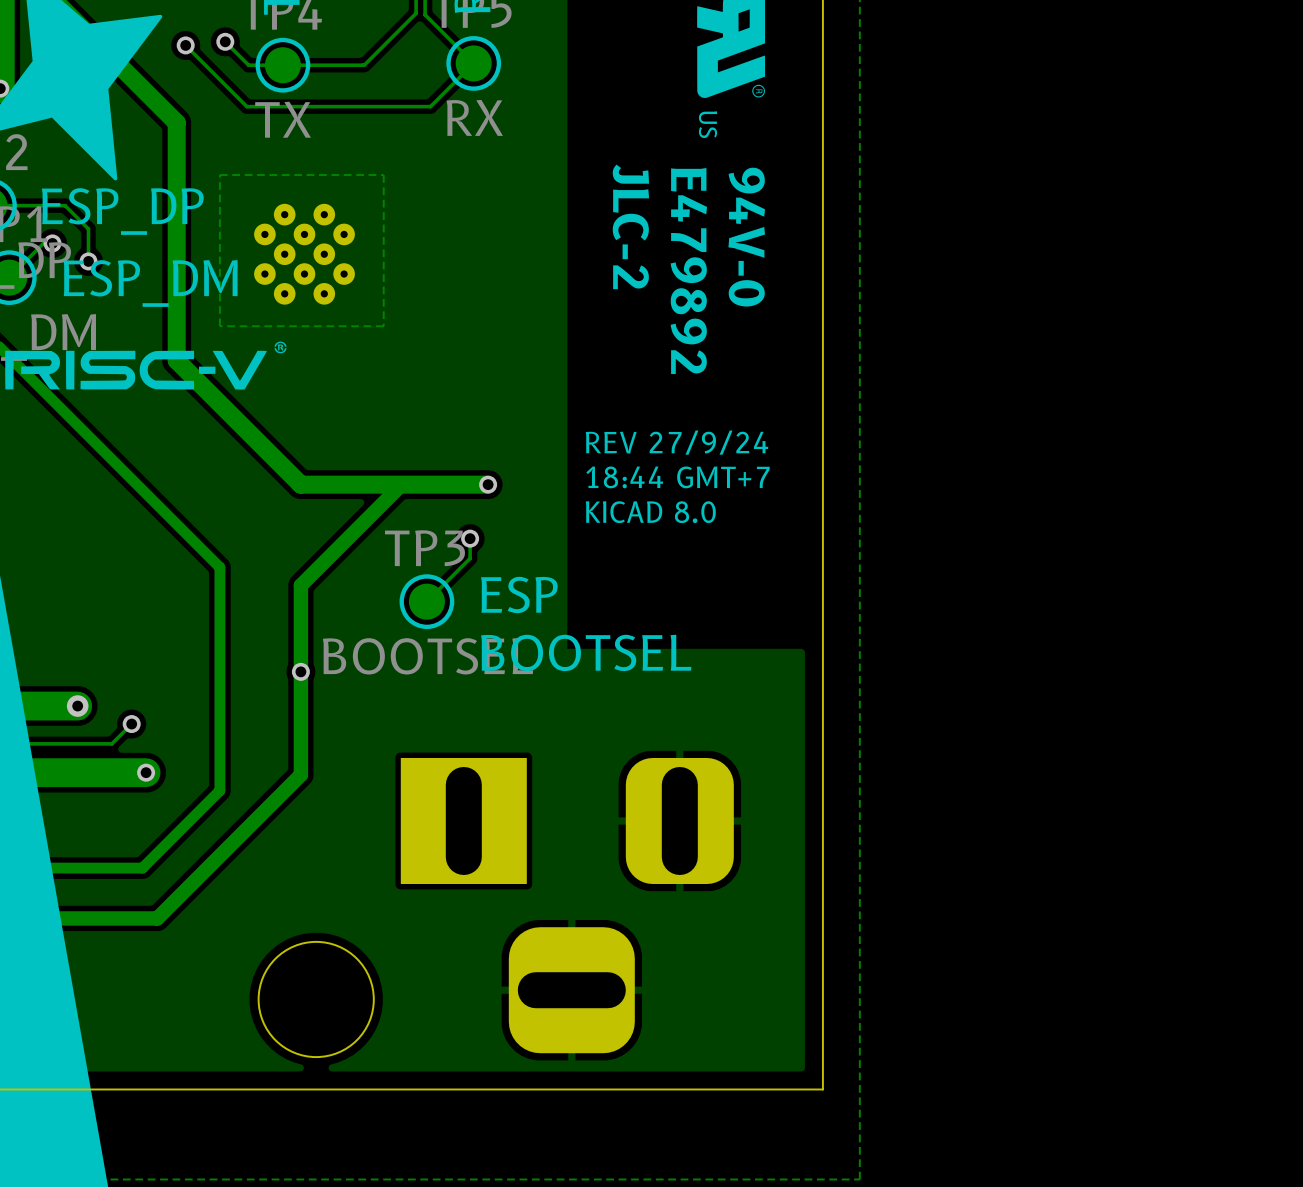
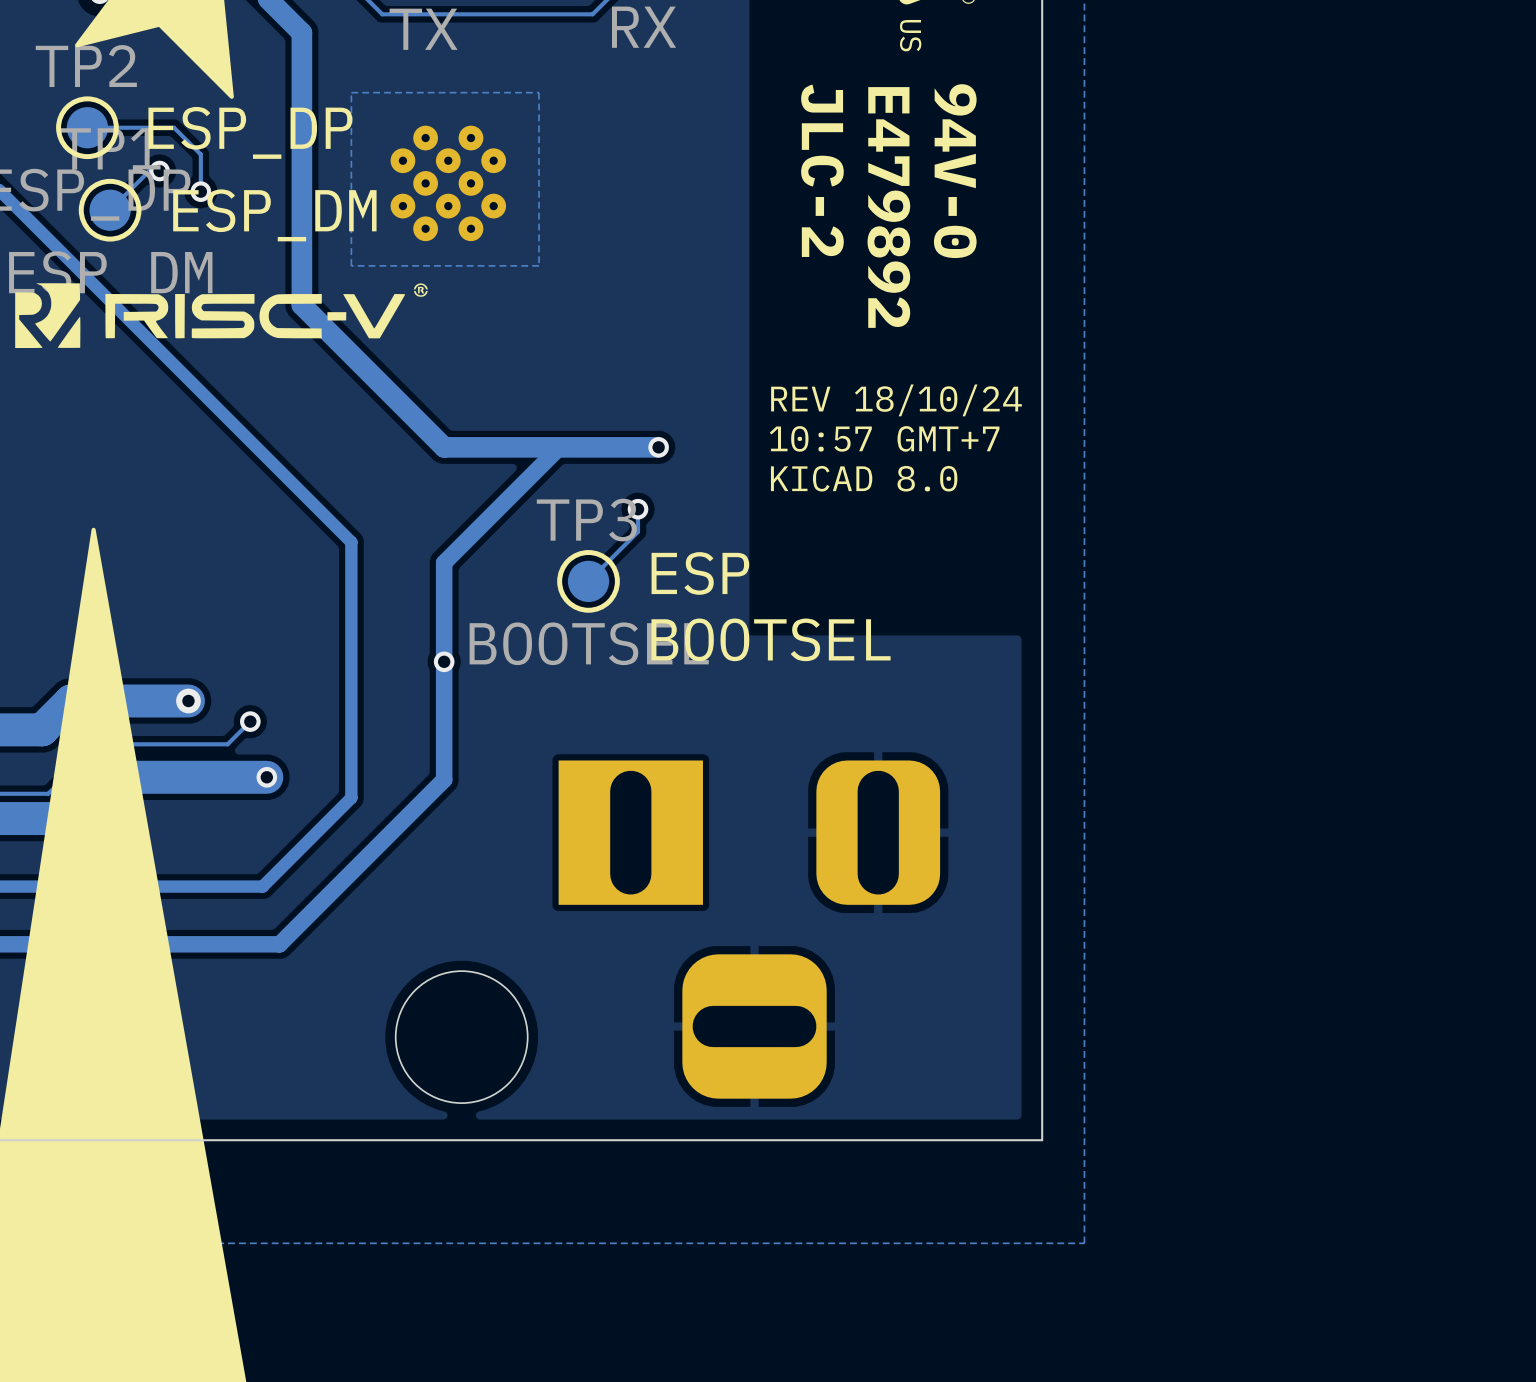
text: REV 27/9/24 (676, 442) -> REV 18/10/24 (896, 400)
text: 18:44 GMT+7 (678, 477) -> 10:57 GMT+7 (884, 438)

